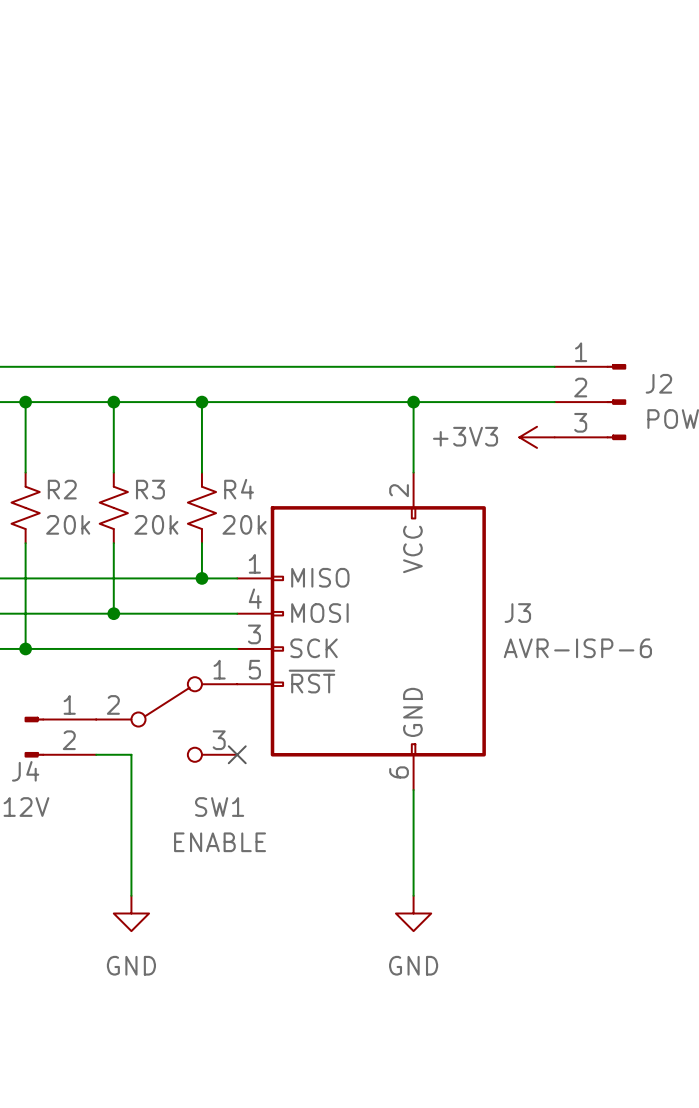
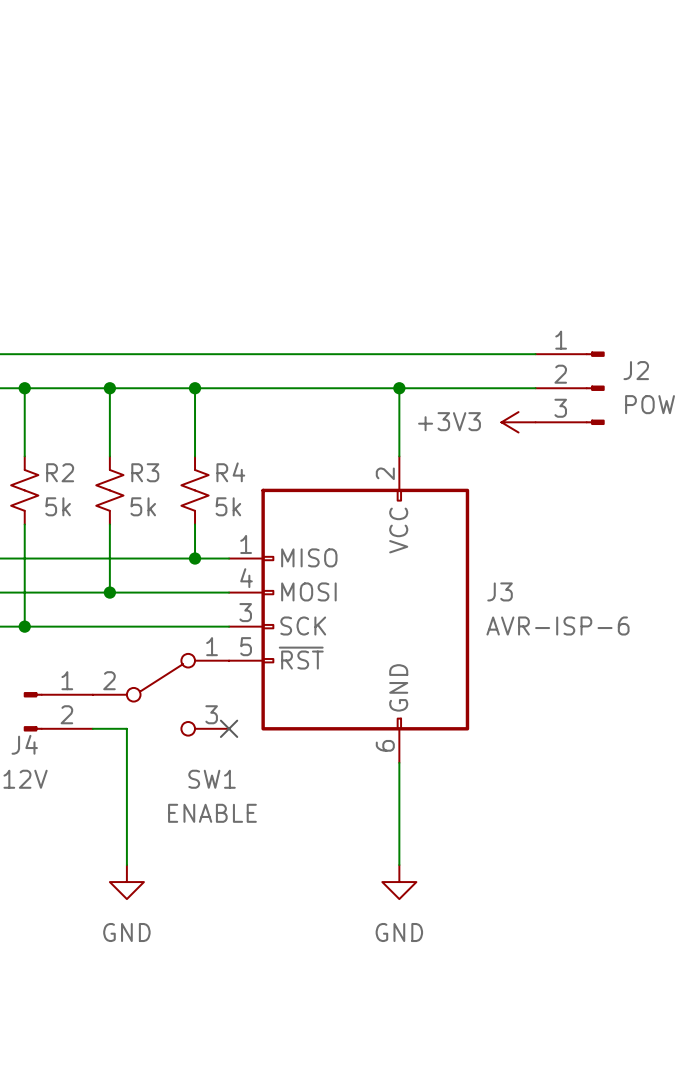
R2 value: 20k (68, 524) -> 5k (58, 506)
R3 value: 20k (156, 524) -> 5k (143, 506)
R4 value: 20k (244, 524) -> 5k (228, 506)

